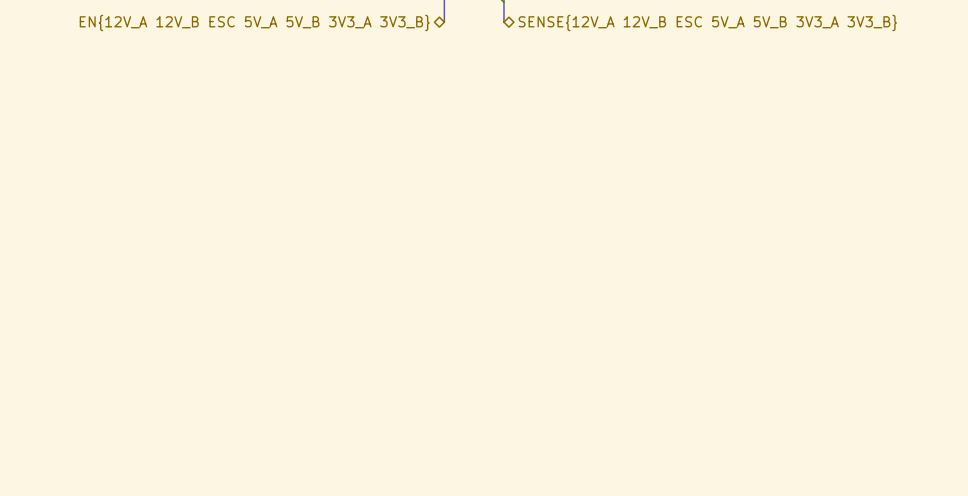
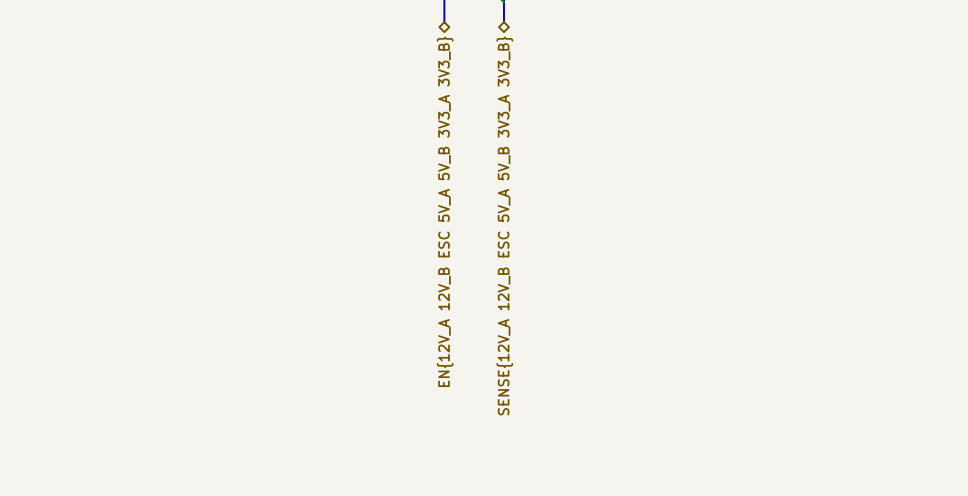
hierarchical label rotation: 0° (254, 22) -> 90° counterclockwise (445, 211)
hierarchical label rotation: 0° (707, 22) -> 90° clockwise (504, 226)

